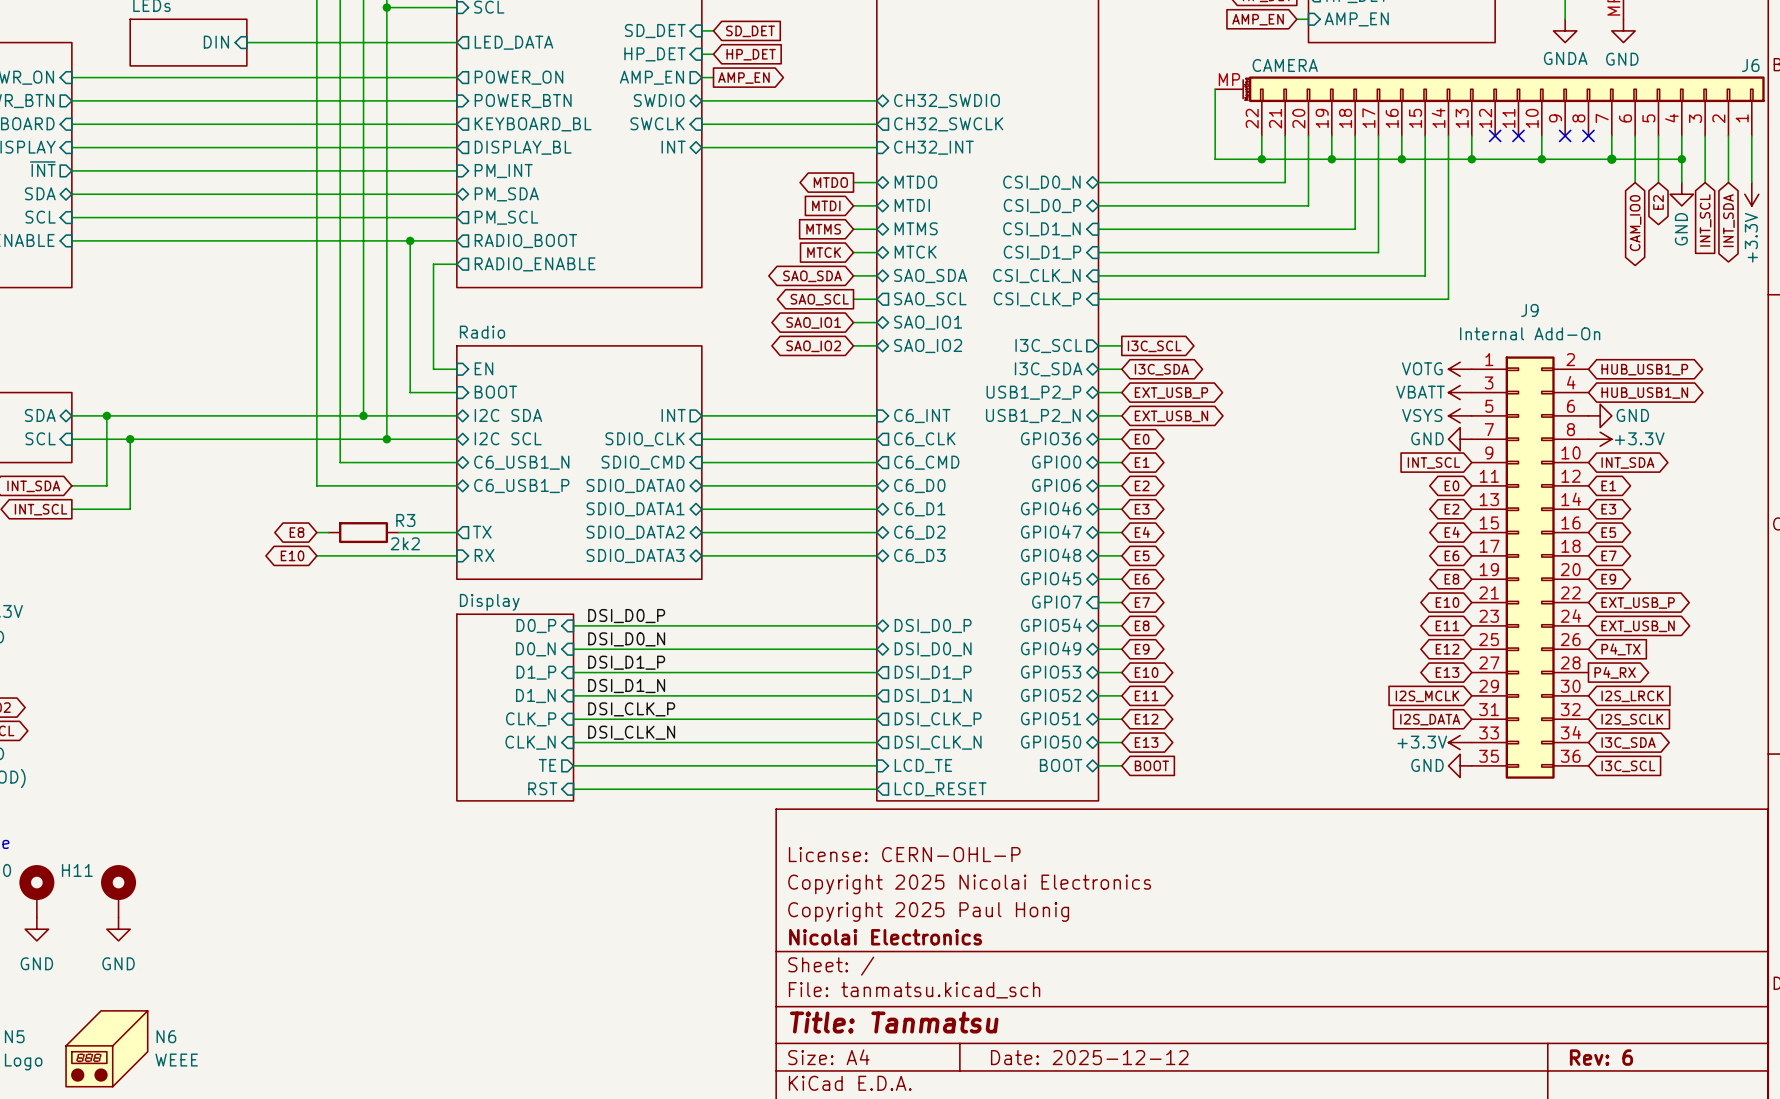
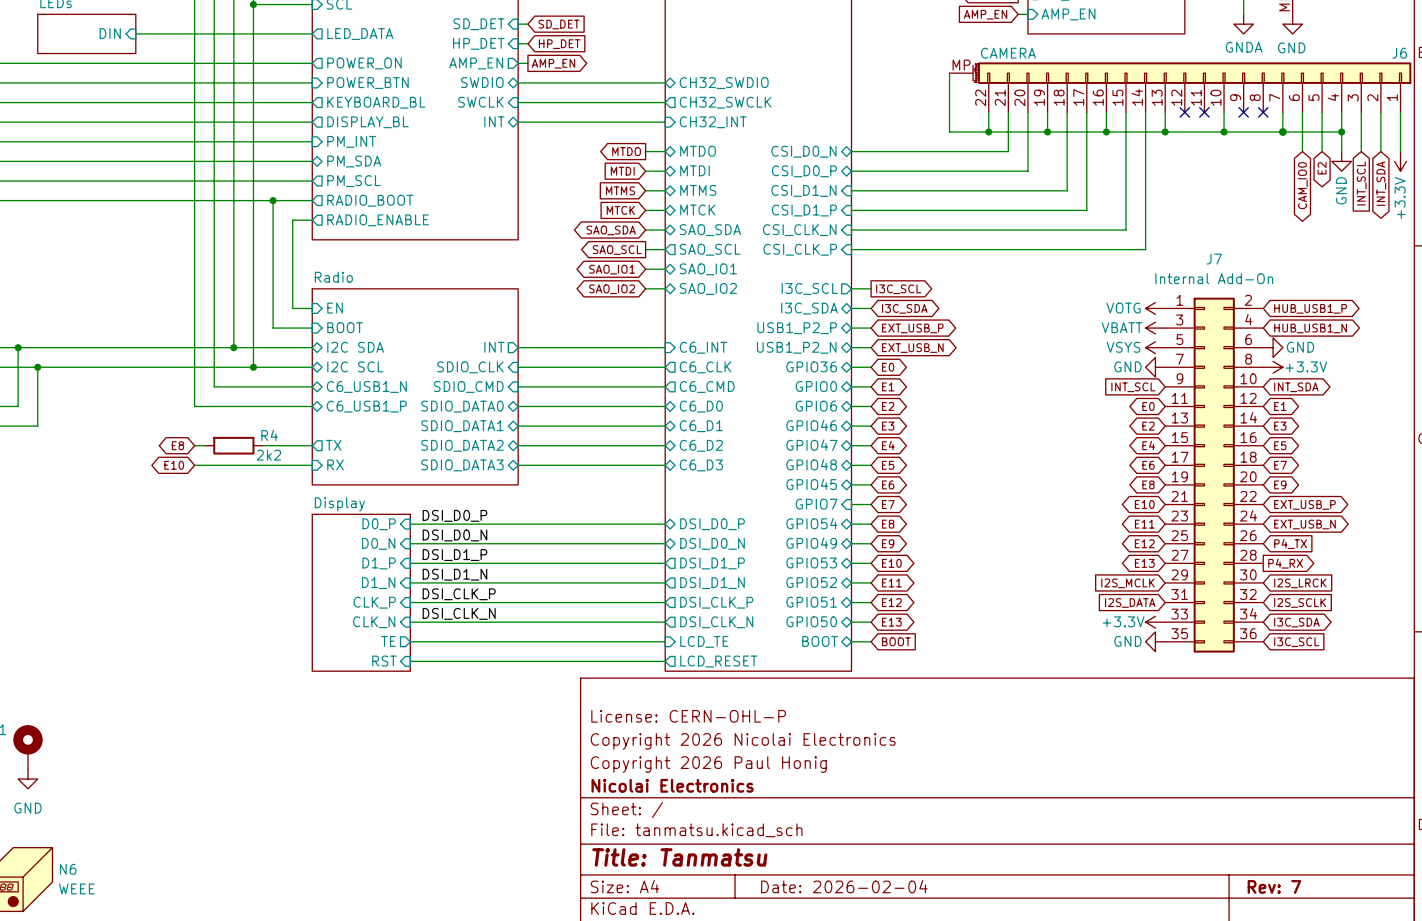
J9 name: J9 (1529, 310) -> J7 (1214, 259)
R3 name: R3 (405, 520) -> R4 (269, 435)
title block: Copyright 2025 Nicolai Electronics (969, 884) -> Copyright 2026 Nicolai Electronics (743, 741)
title block: Copyright 2025 Paul Honig (928, 911) -> Copyright 2026 Paul Honig (708, 764)
title block: Date: 2025-12-12 (1089, 1057) -> Date: 2026-02-04 (844, 886)
title block: Rev: 6 (1601, 1057) -> Rev: 7 (1274, 886)

